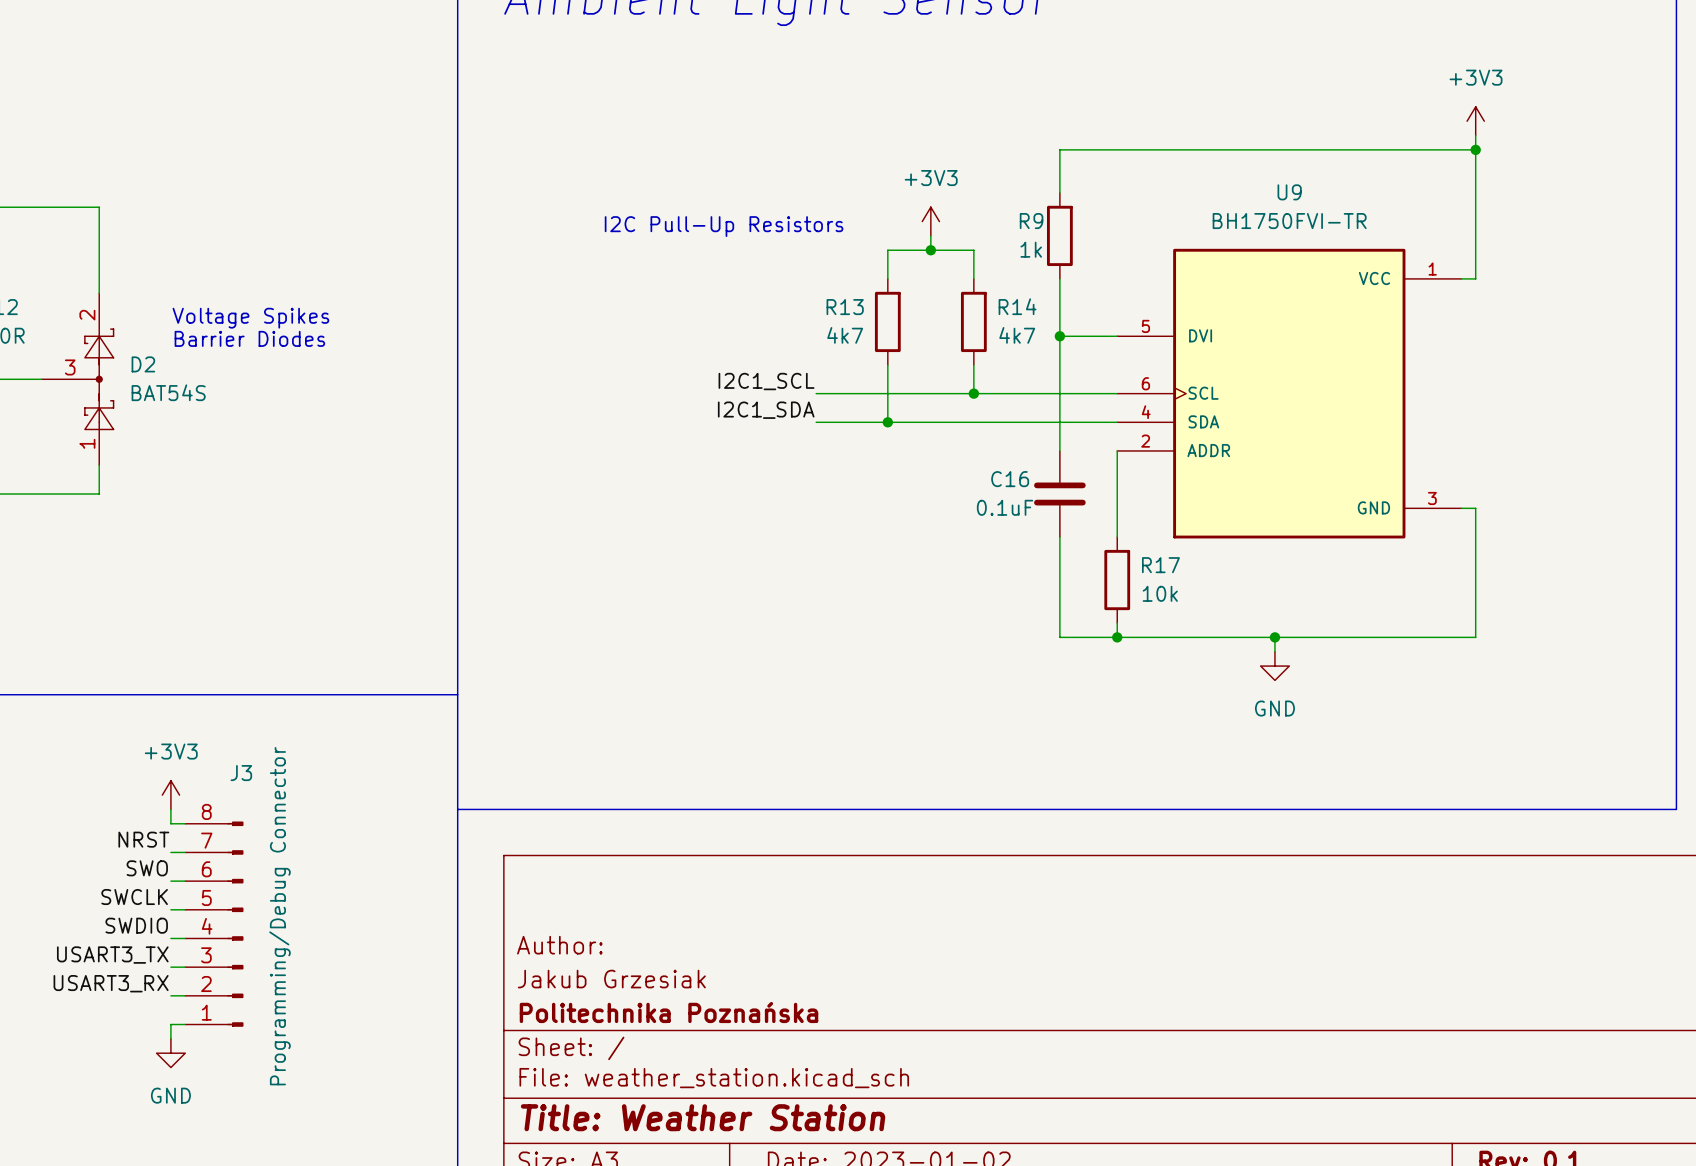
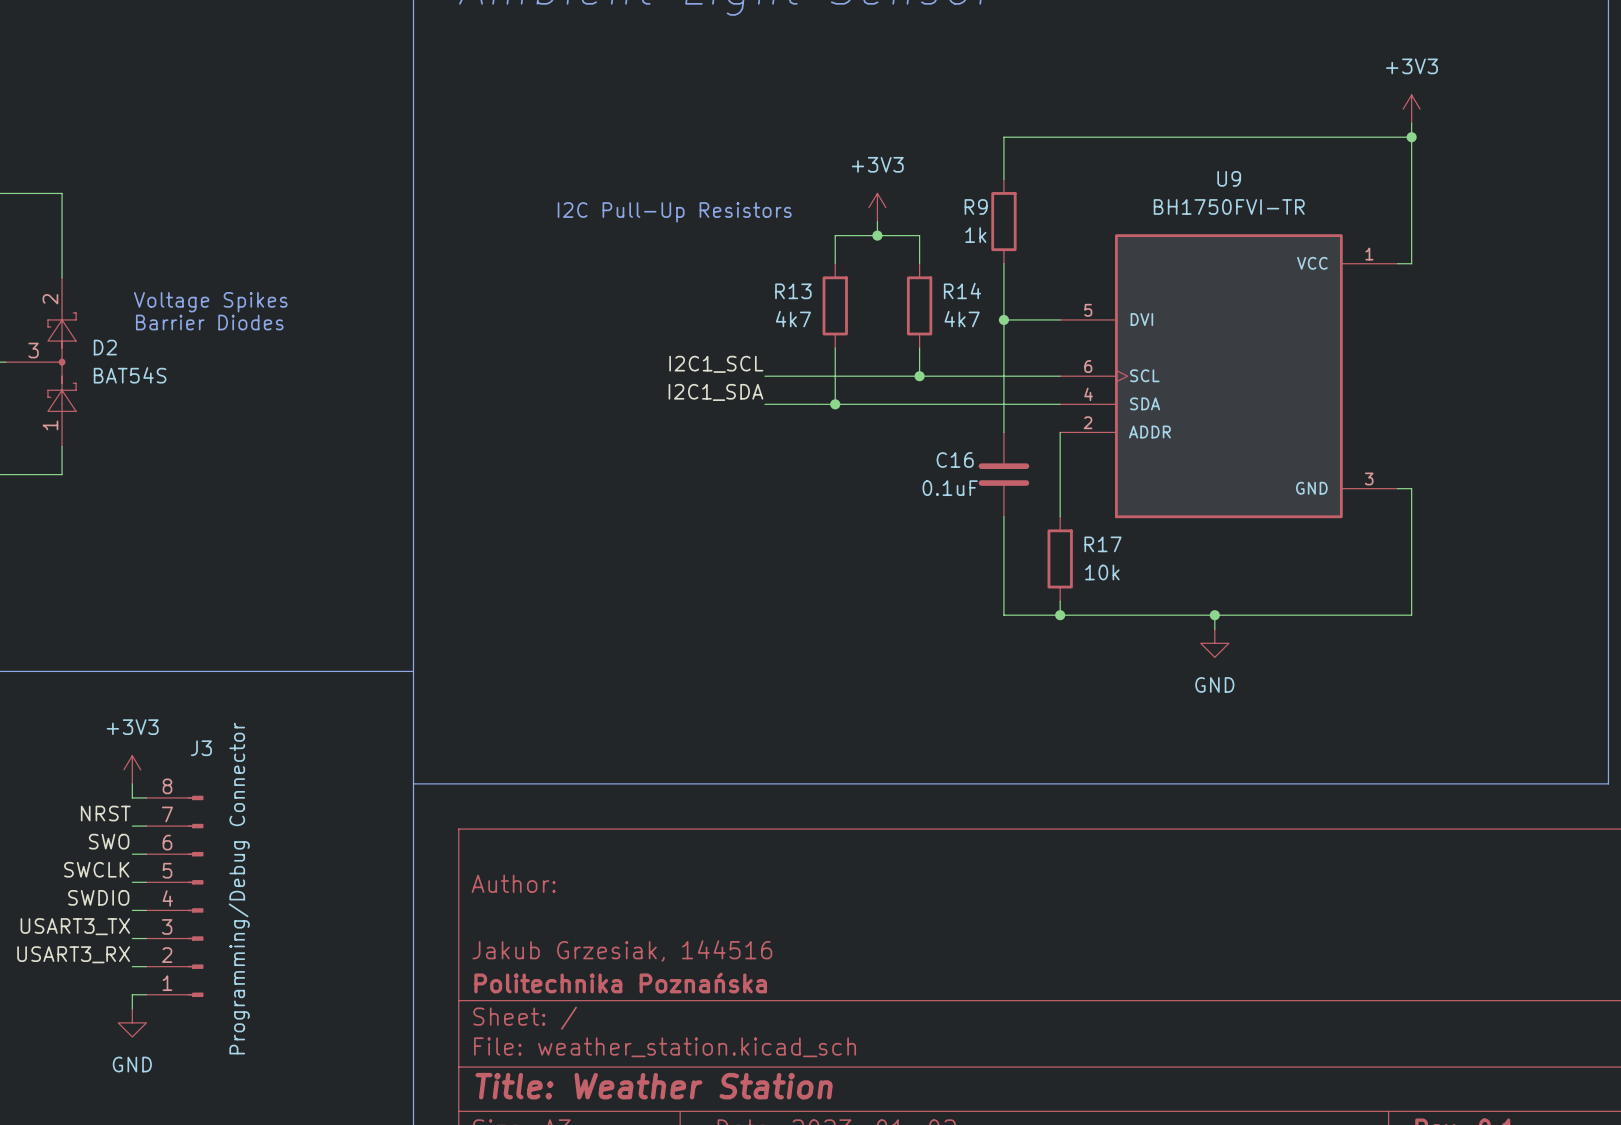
title block position: Author: (559, 945) -> Author: (513, 883)
title block: Jakub Grzesiak (611, 979) -> Jakub Grzesiak, 144516 (622, 950)

